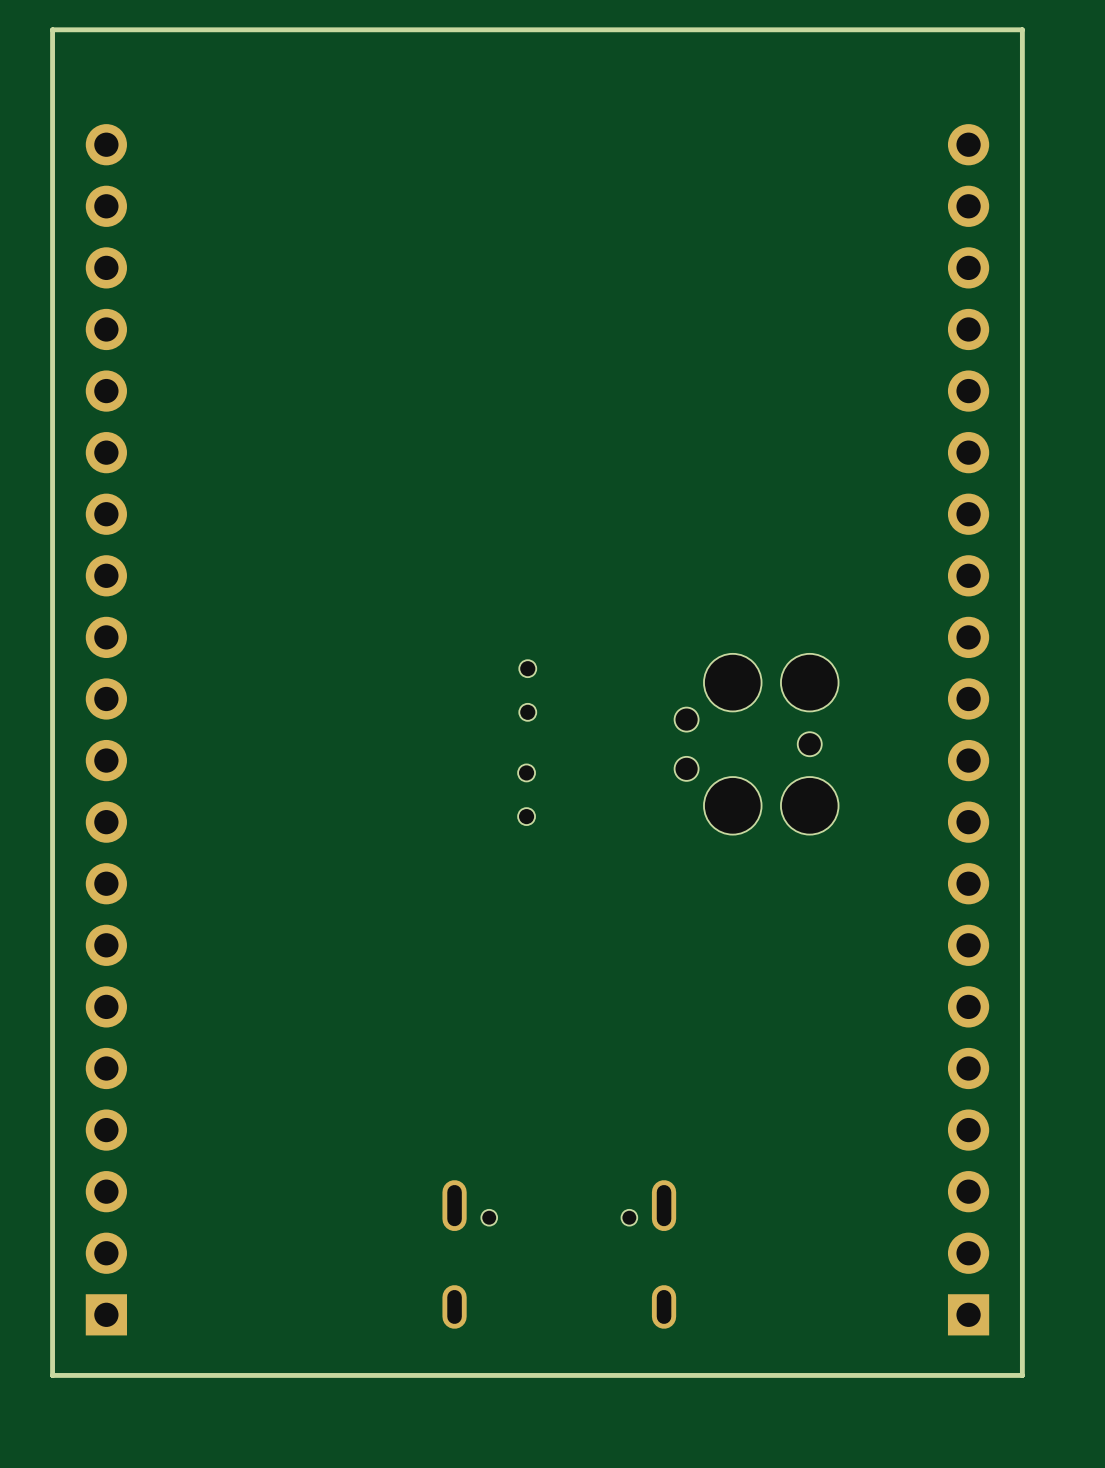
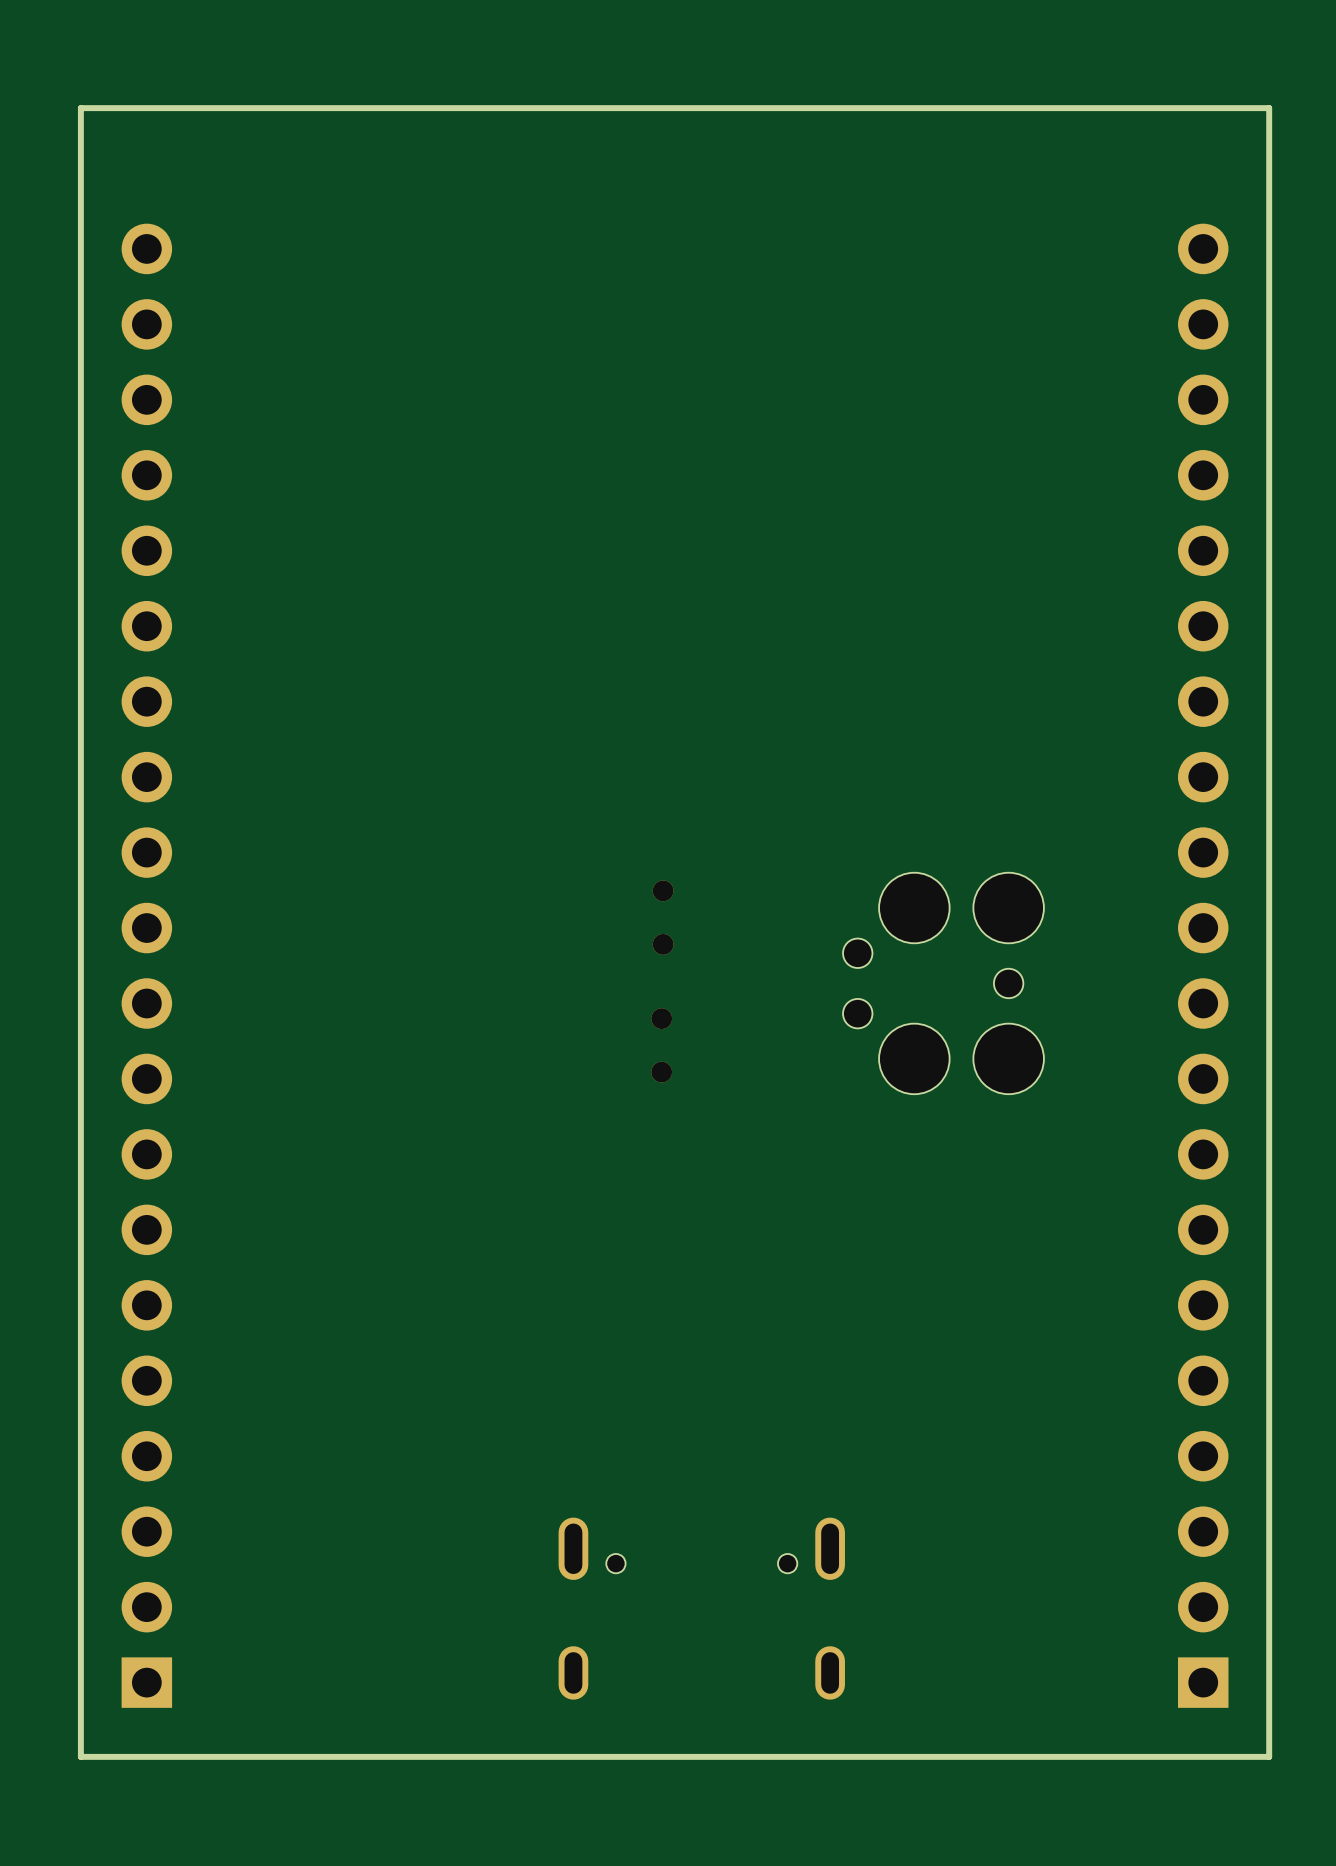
part footprint: [519, 660, 537, 721] -> [652, 880, 674, 955]
part footprint: [518, 764, 536, 826] -> [651, 1008, 673, 1083]

